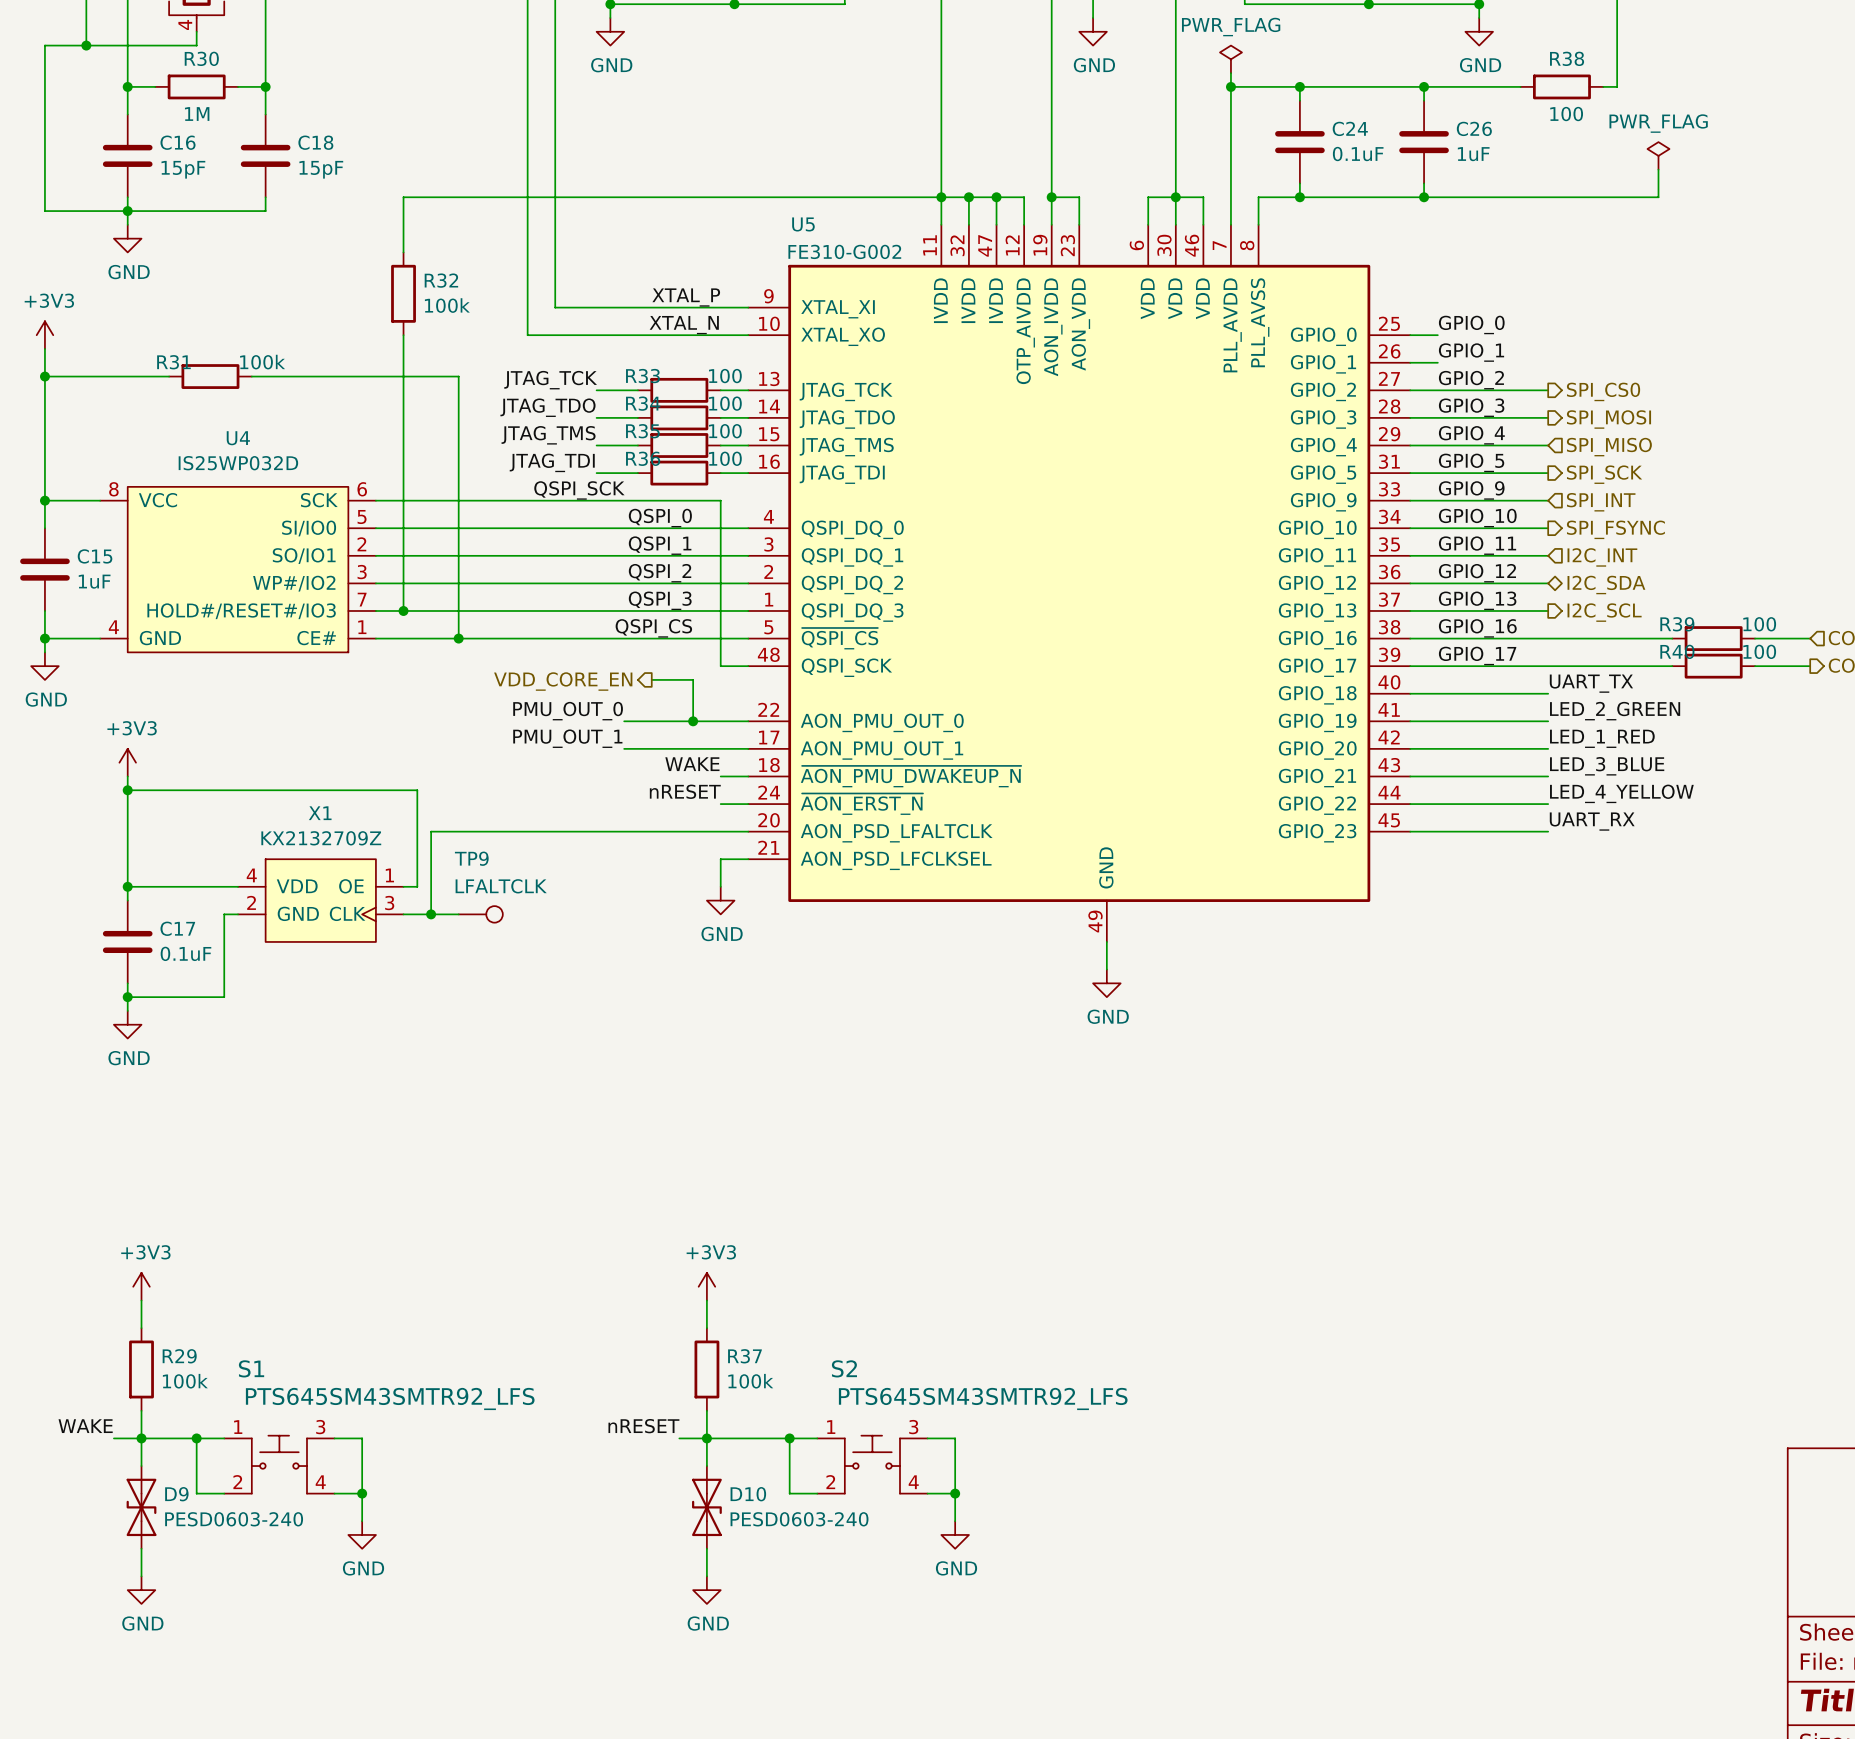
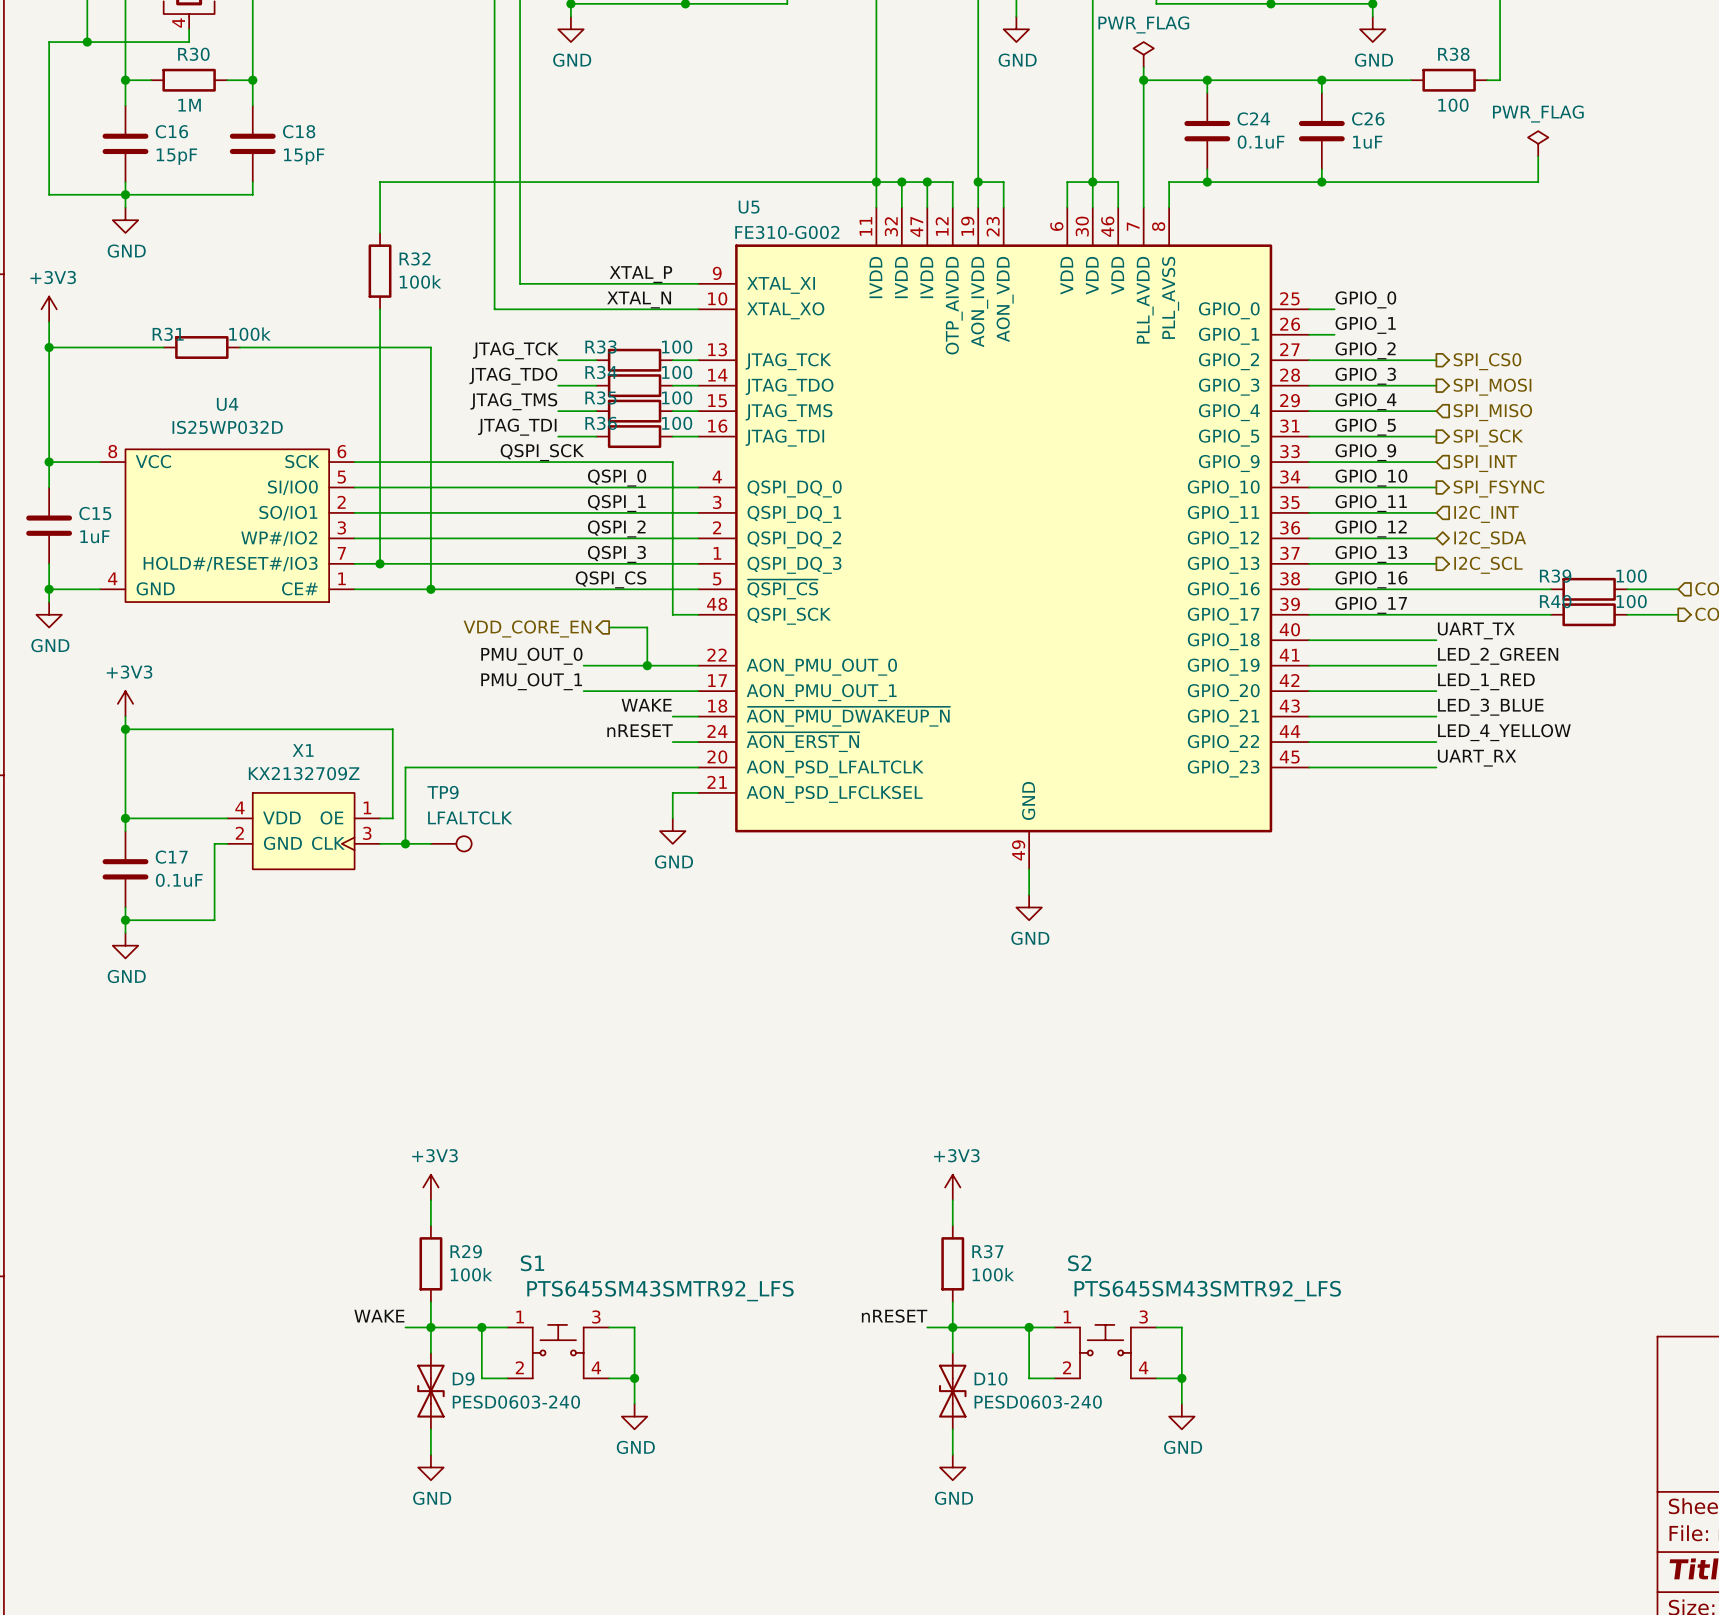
power symbol: +3V3 (141, 1286) -> none
power symbol: none -> +3V3 (430, 1187)
power symbol: +3V3 (706, 1286) -> none
power symbol: none -> +3V3 (952, 1187)
wire: (141, 1300) (141, 1328) -> none
wire: (706, 1300) (706, 1328) -> (430, 1200) (430, 1225)
wire: none -> (952, 1200) (952, 1225)
R29 position: (141, 1369) -> (430, 1263)
R37 position: (706, 1369) -> (952, 1263)
wire: (141, 1410) (141, 1466) -> none
wire: (706, 1410) (706, 1466) -> (430, 1302) (430, 1352)
wire: none -> (952, 1302) (952, 1352)
label: WAKE (85, 1426) -> none
label: none -> WAKE (379, 1316)
label: nRESET (643, 1426) -> none
label: none -> nRESET (894, 1316)
wire: (113, 1438) (224, 1438) -> none
junction: (141, 1438) -> none
wire: (196, 1438) (196, 1493) (224, 1493) -> none
junction: (196, 1438) -> none
wire: (334, 1438) (362, 1438) (362, 1521) -> none
wire: none -> (405, 1327) (507, 1327)
junction: none -> (430, 1327)
wire: none -> (481, 1327) (481, 1378) (507, 1378)
junction: none -> (481, 1327)
wire: none -> (609, 1327) (634, 1327) (634, 1403)
wire: (679, 1438) (817, 1438) -> none
junction: (706, 1438) -> none
wire: (789, 1438) (789, 1493) (817, 1493) -> none
junction: (789, 1438) -> none
wire: (927, 1438) (955, 1438) (955, 1521) -> none
wire: none -> (927, 1327) (1054, 1327)
junction: none -> (952, 1327)
wire: none -> (1029, 1327) (1029, 1378) (1054, 1378)
junction: none -> (1029, 1327)
wire: none -> (1156, 1327) (1181, 1327) (1181, 1403)
S1 position: (279, 1464) -> (558, 1351)
S2 position: (872, 1464) -> (1105, 1351)
wire: (334, 1493) (362, 1493) -> none
junction: (362, 1493) -> none
wire: none -> (609, 1378) (634, 1378)
junction: none -> (634, 1378)
wire: (927, 1493) (955, 1493) -> none
junction: (955, 1493) -> none
wire: none -> (1156, 1378) (1181, 1378)
junction: none -> (1181, 1378)
D9 position: (141, 1507) -> (430, 1391)
D10 position: (706, 1507) -> (952, 1391)
power symbol position: GND (362, 1534) -> GND (430, 1467)
power symbol position: GND (955, 1534) -> GND (952, 1467)
power symbol: none -> GND (1181, 1416)
wire: (141, 1548) (141, 1576) -> none
wire: (706, 1548) (706, 1576) -> (430, 1429) (430, 1454)
wire: none -> (952, 1429) (952, 1454)
power symbol: GND (141, 1590) -> none
power symbol position: GND (706, 1590) -> GND (634, 1416)

